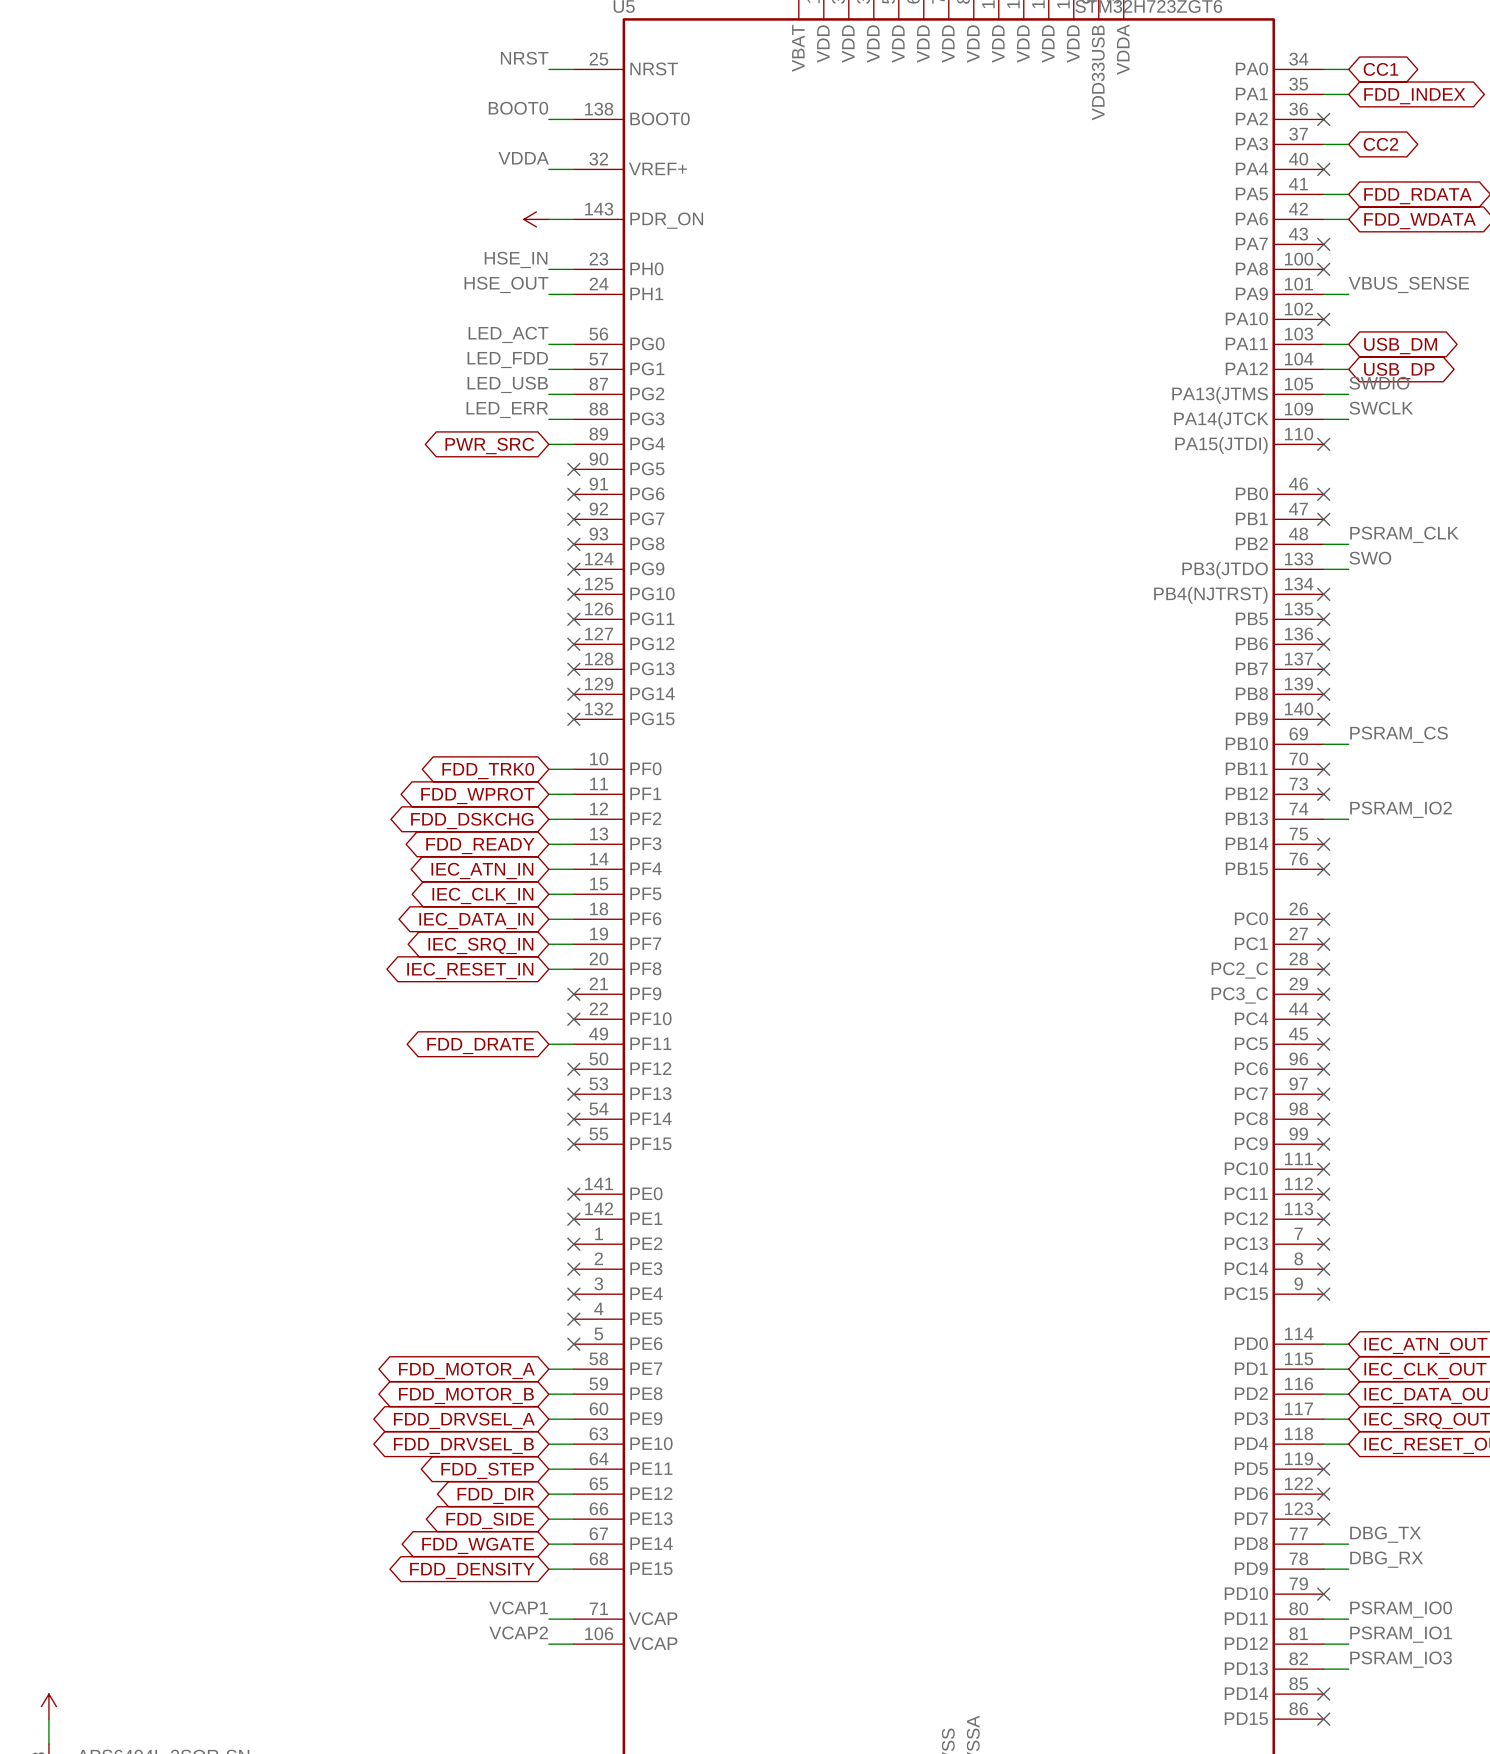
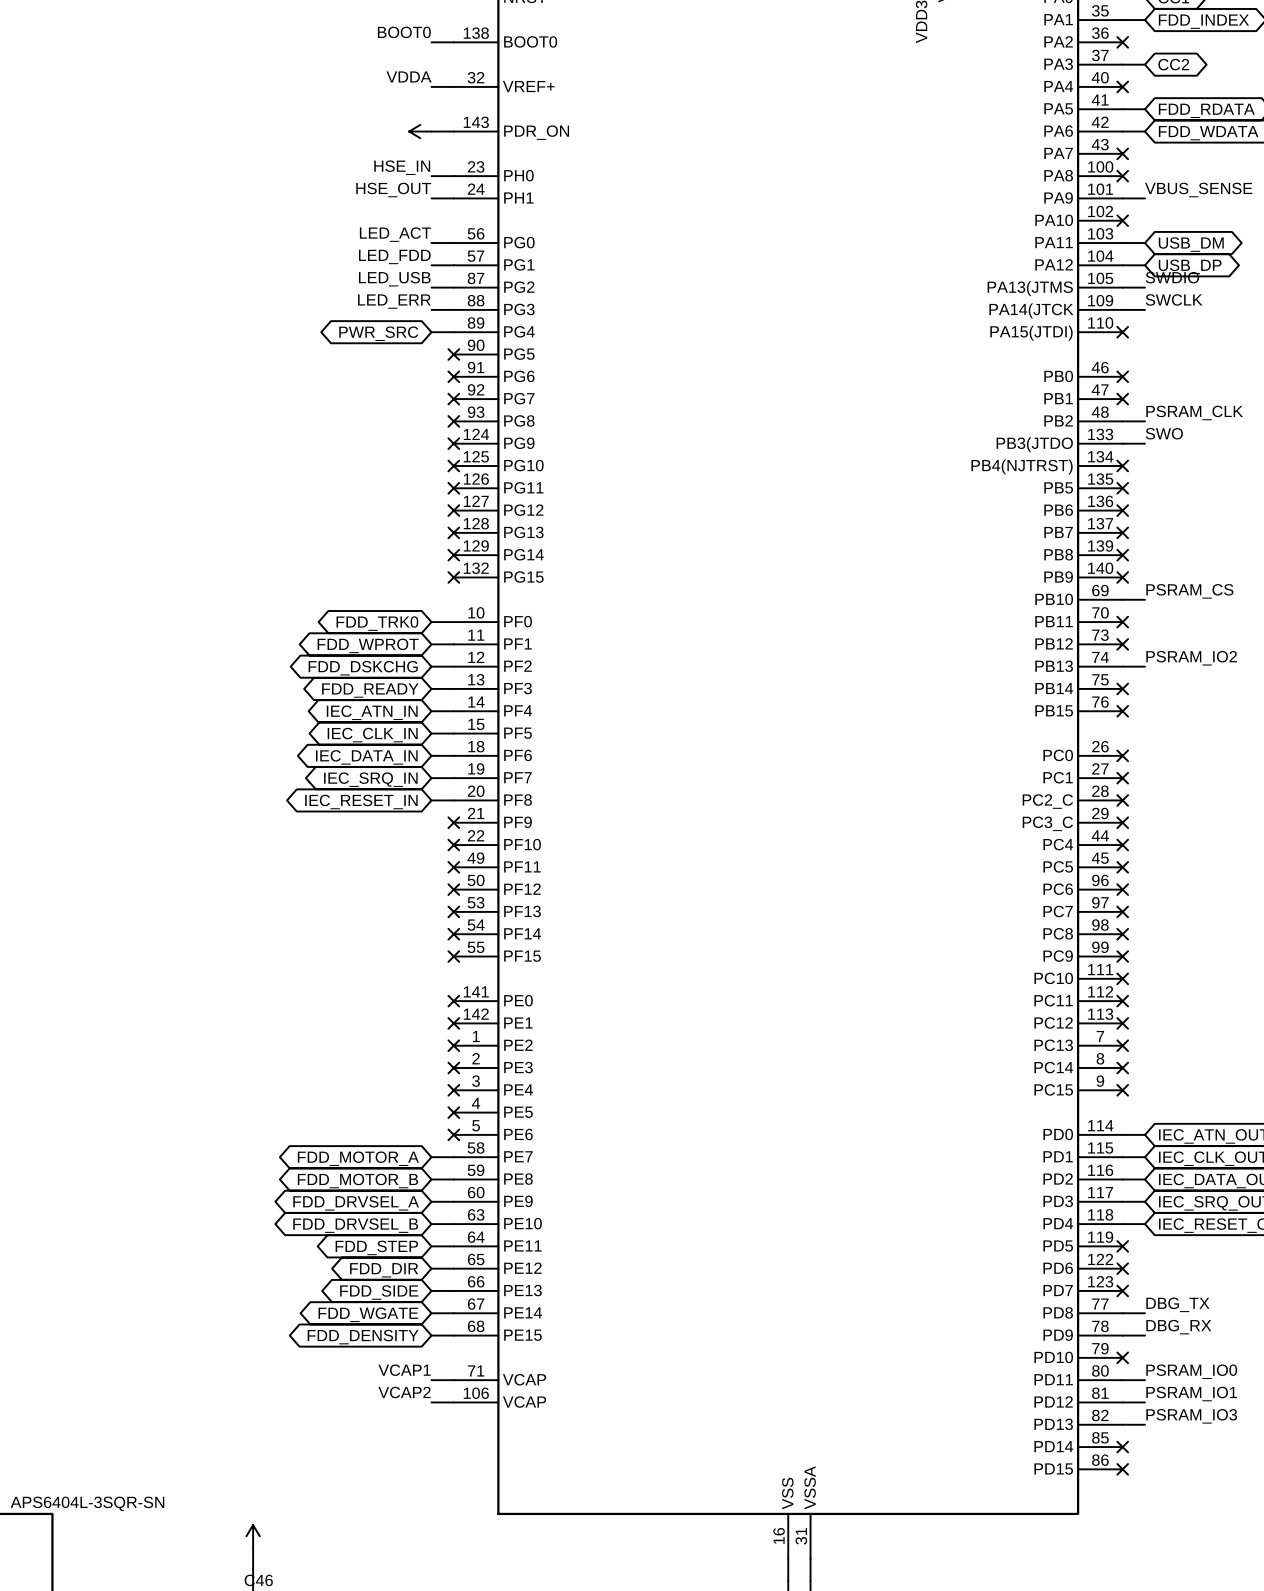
wire: (548, 1044) (573, 1044) -> none
no-connect mark: none -> (453, 867)
global label: FDD_DRATE (480, 1046) -> none

